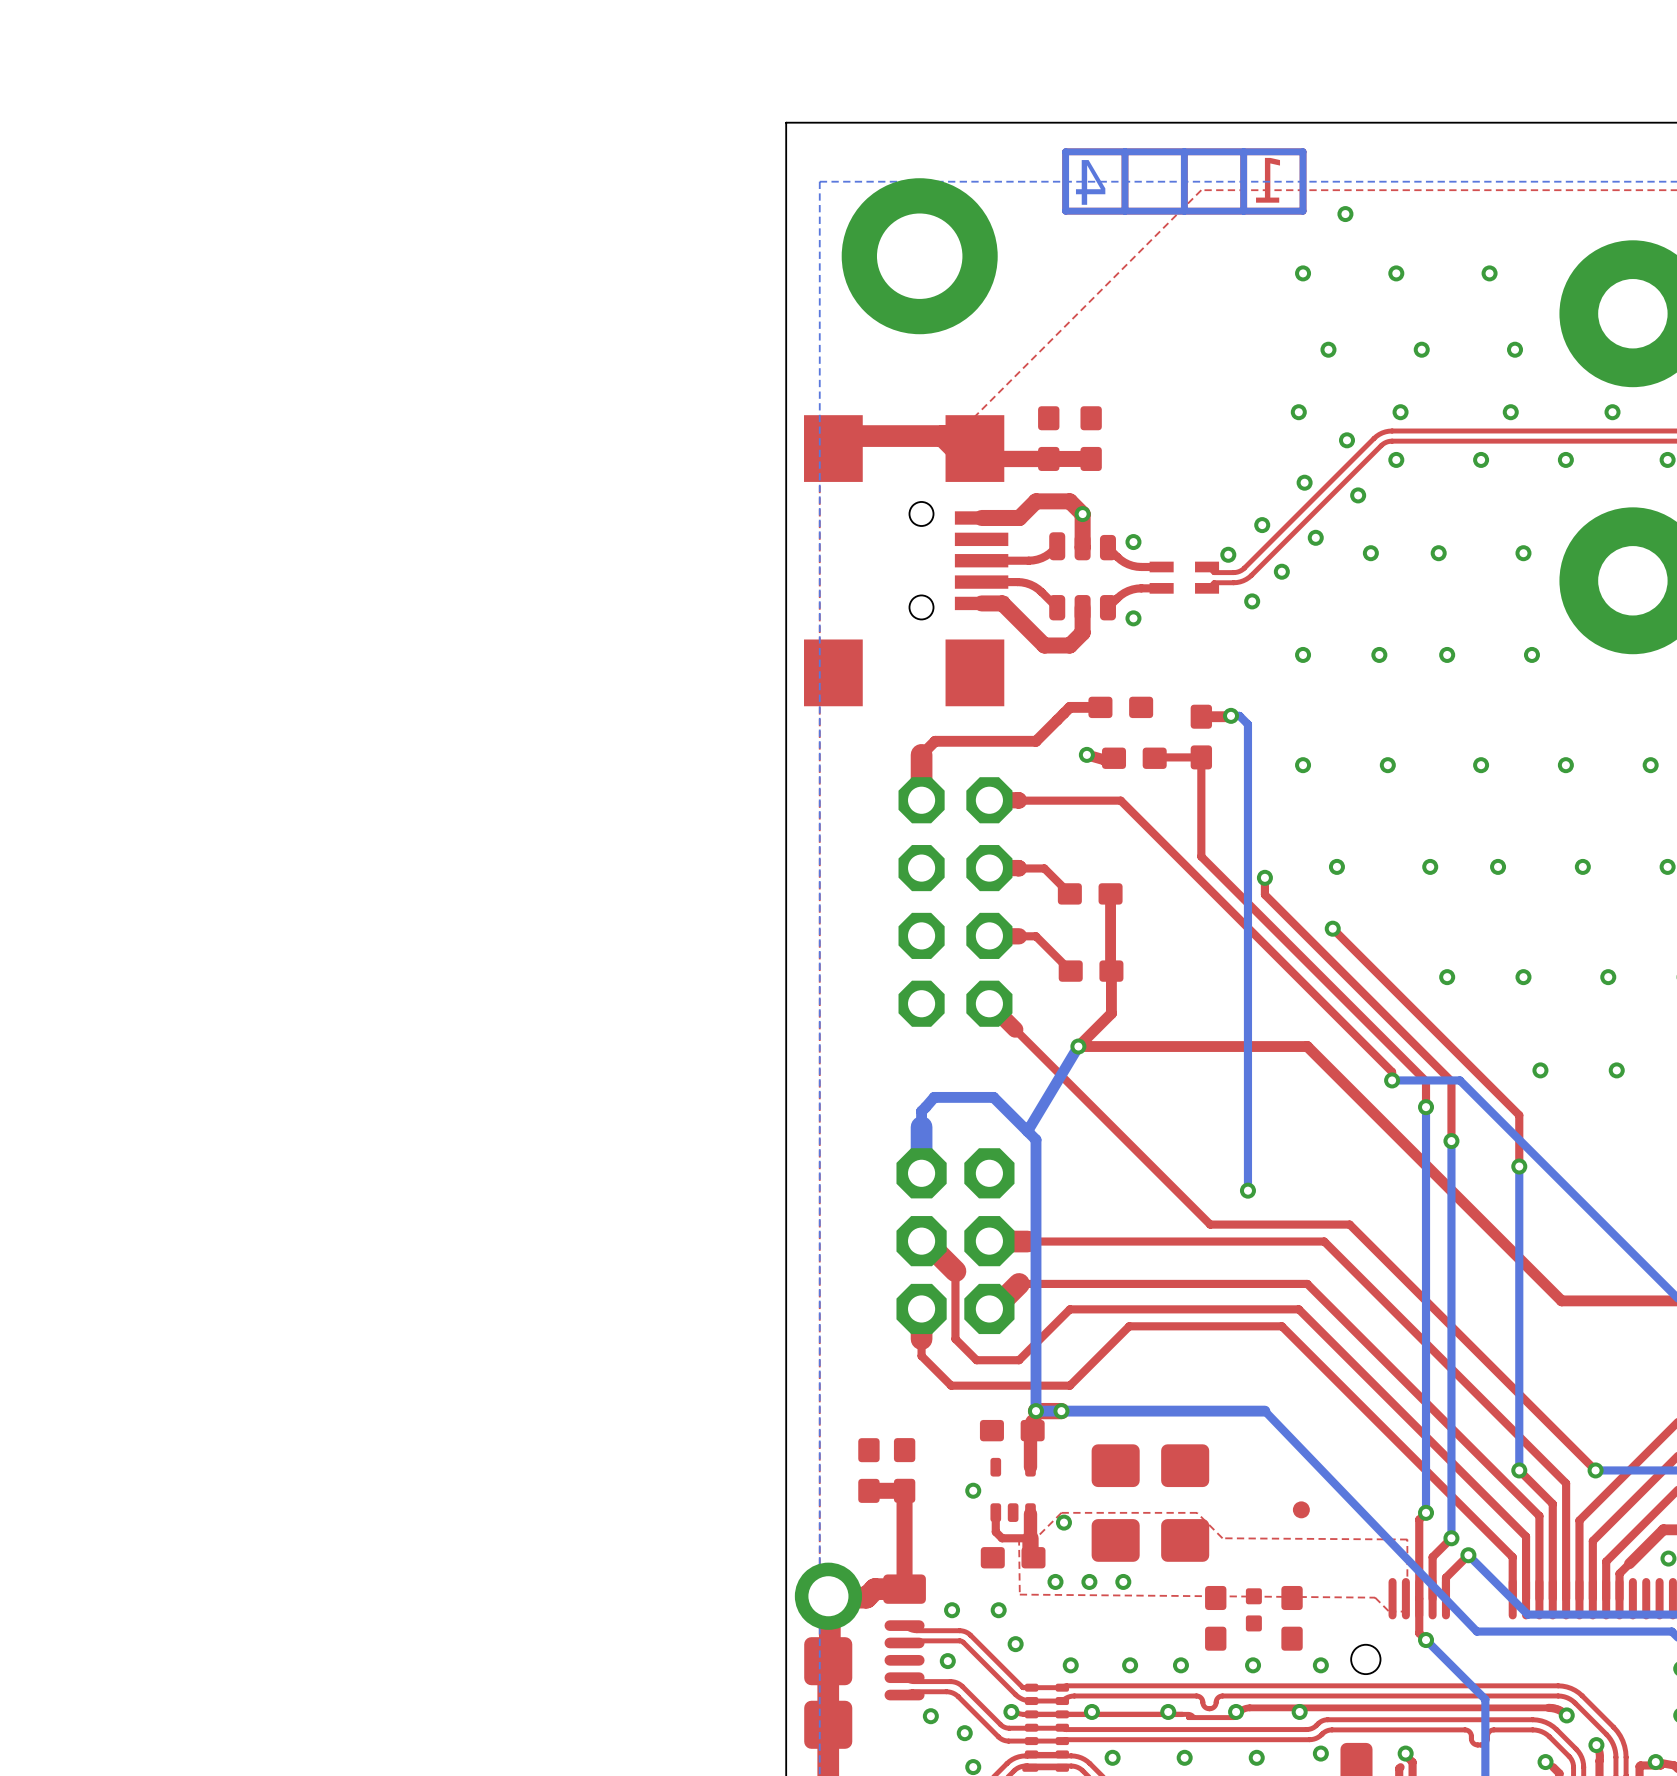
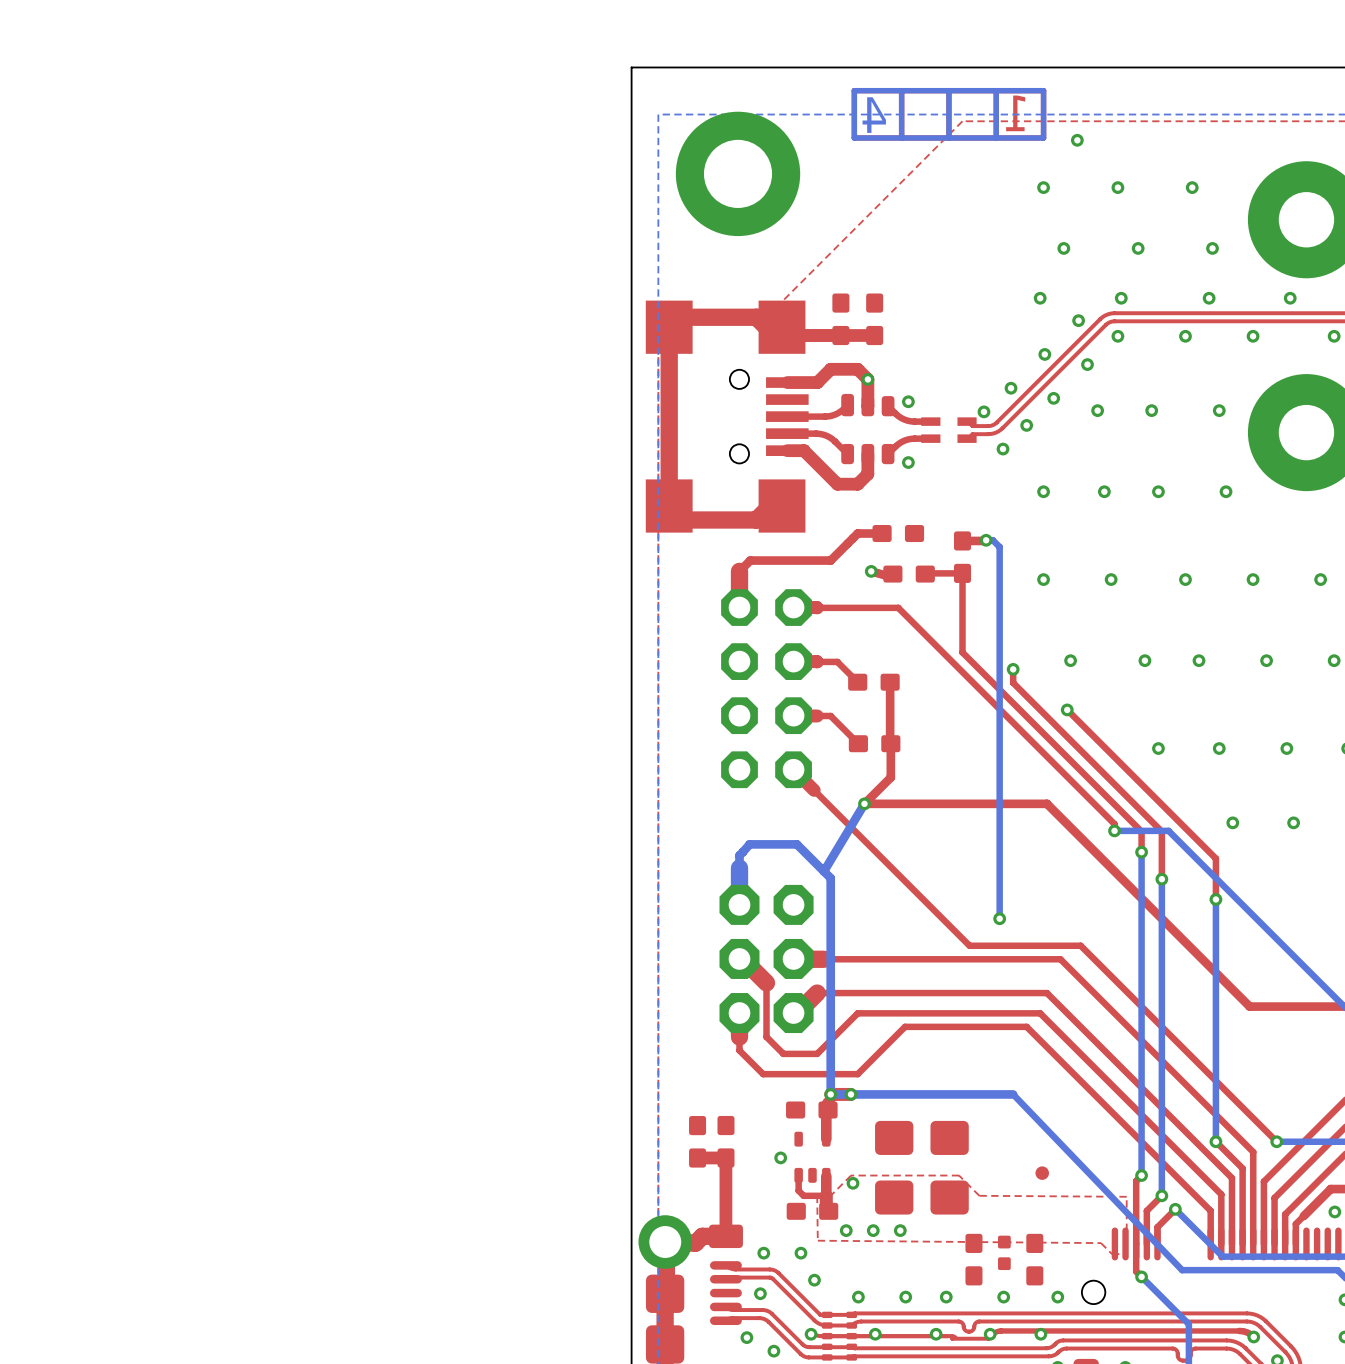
top track: none -> (669, 330) (669, 506) (683, 520) (756, 520) (770, 506) (782, 506)

